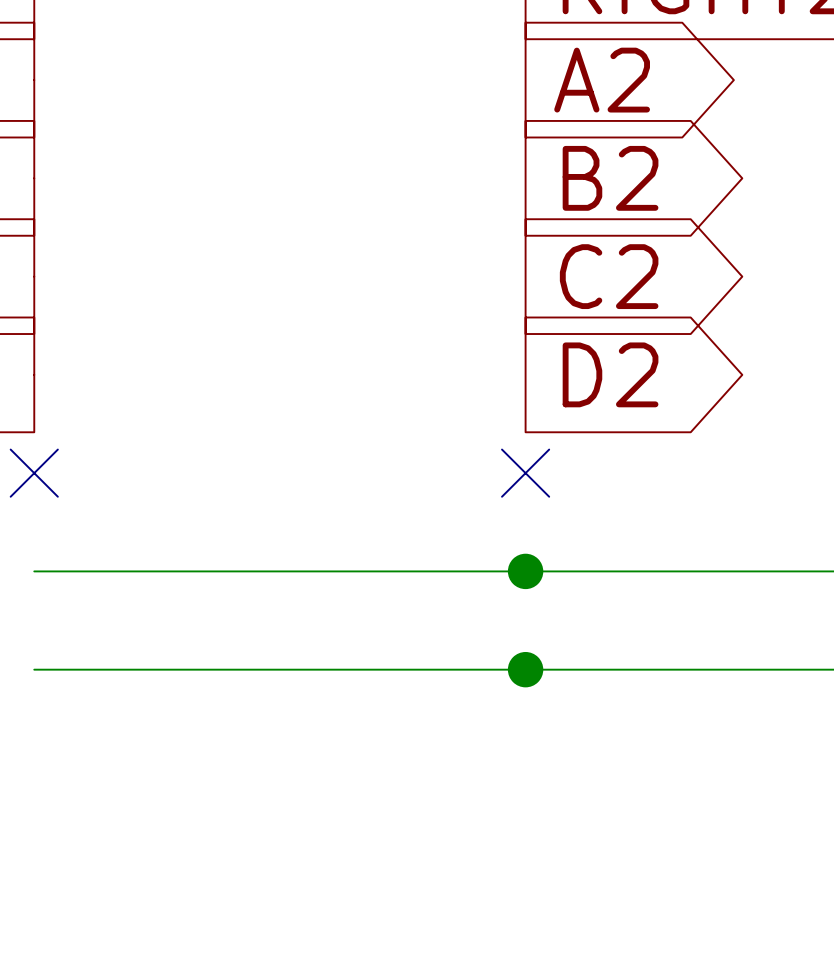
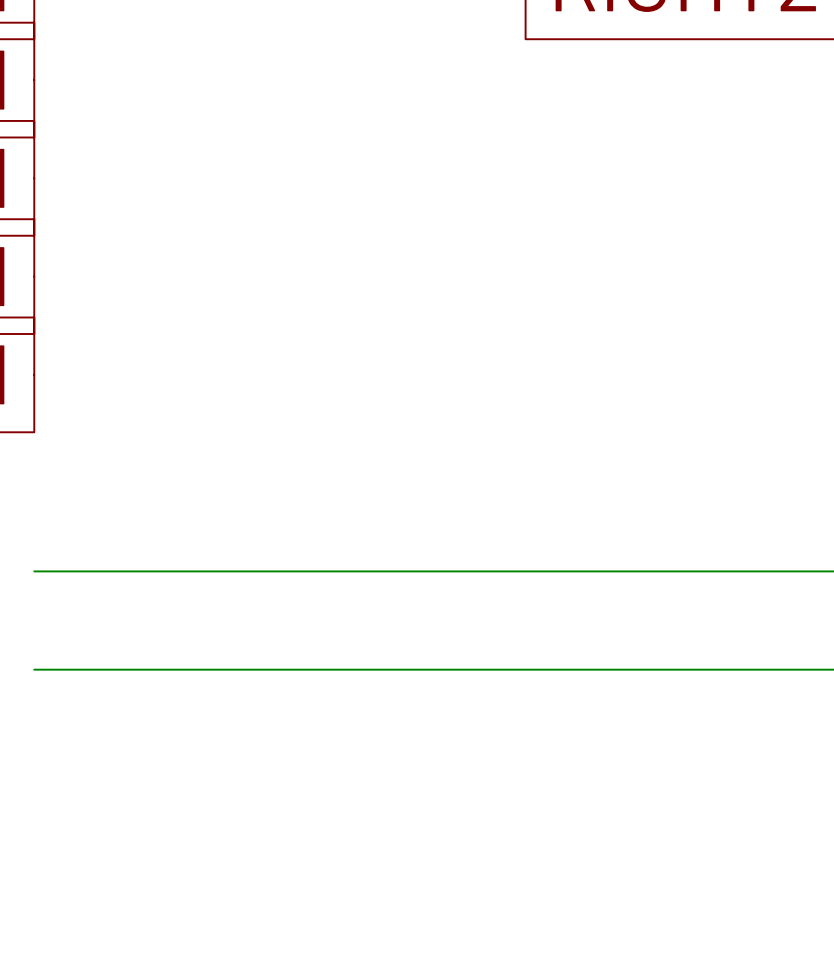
global label: A2 (602, 80) -> none
global label: B2 (610, 178) -> none
global label: C2 (609, 276) -> none
global label: D2 (610, 374) -> none
no-connect mark: (34, 473) -> none
no-connect mark: (525, 473) -> none
junction: (525, 571) -> none
junction: (525, 669) -> none

